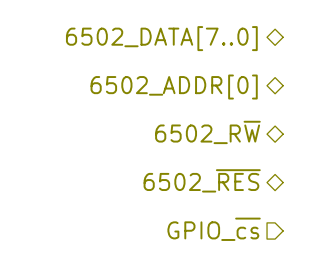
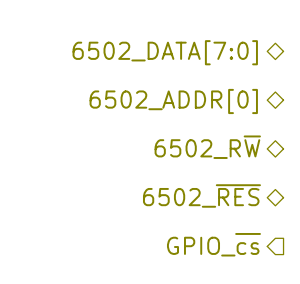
hierarchical label: 6502_DATA[7..0] (161, 38) -> 6502_DATA[7:0] (165, 52)
hierarchical label shape: input (214, 229) -> output (213, 244)

